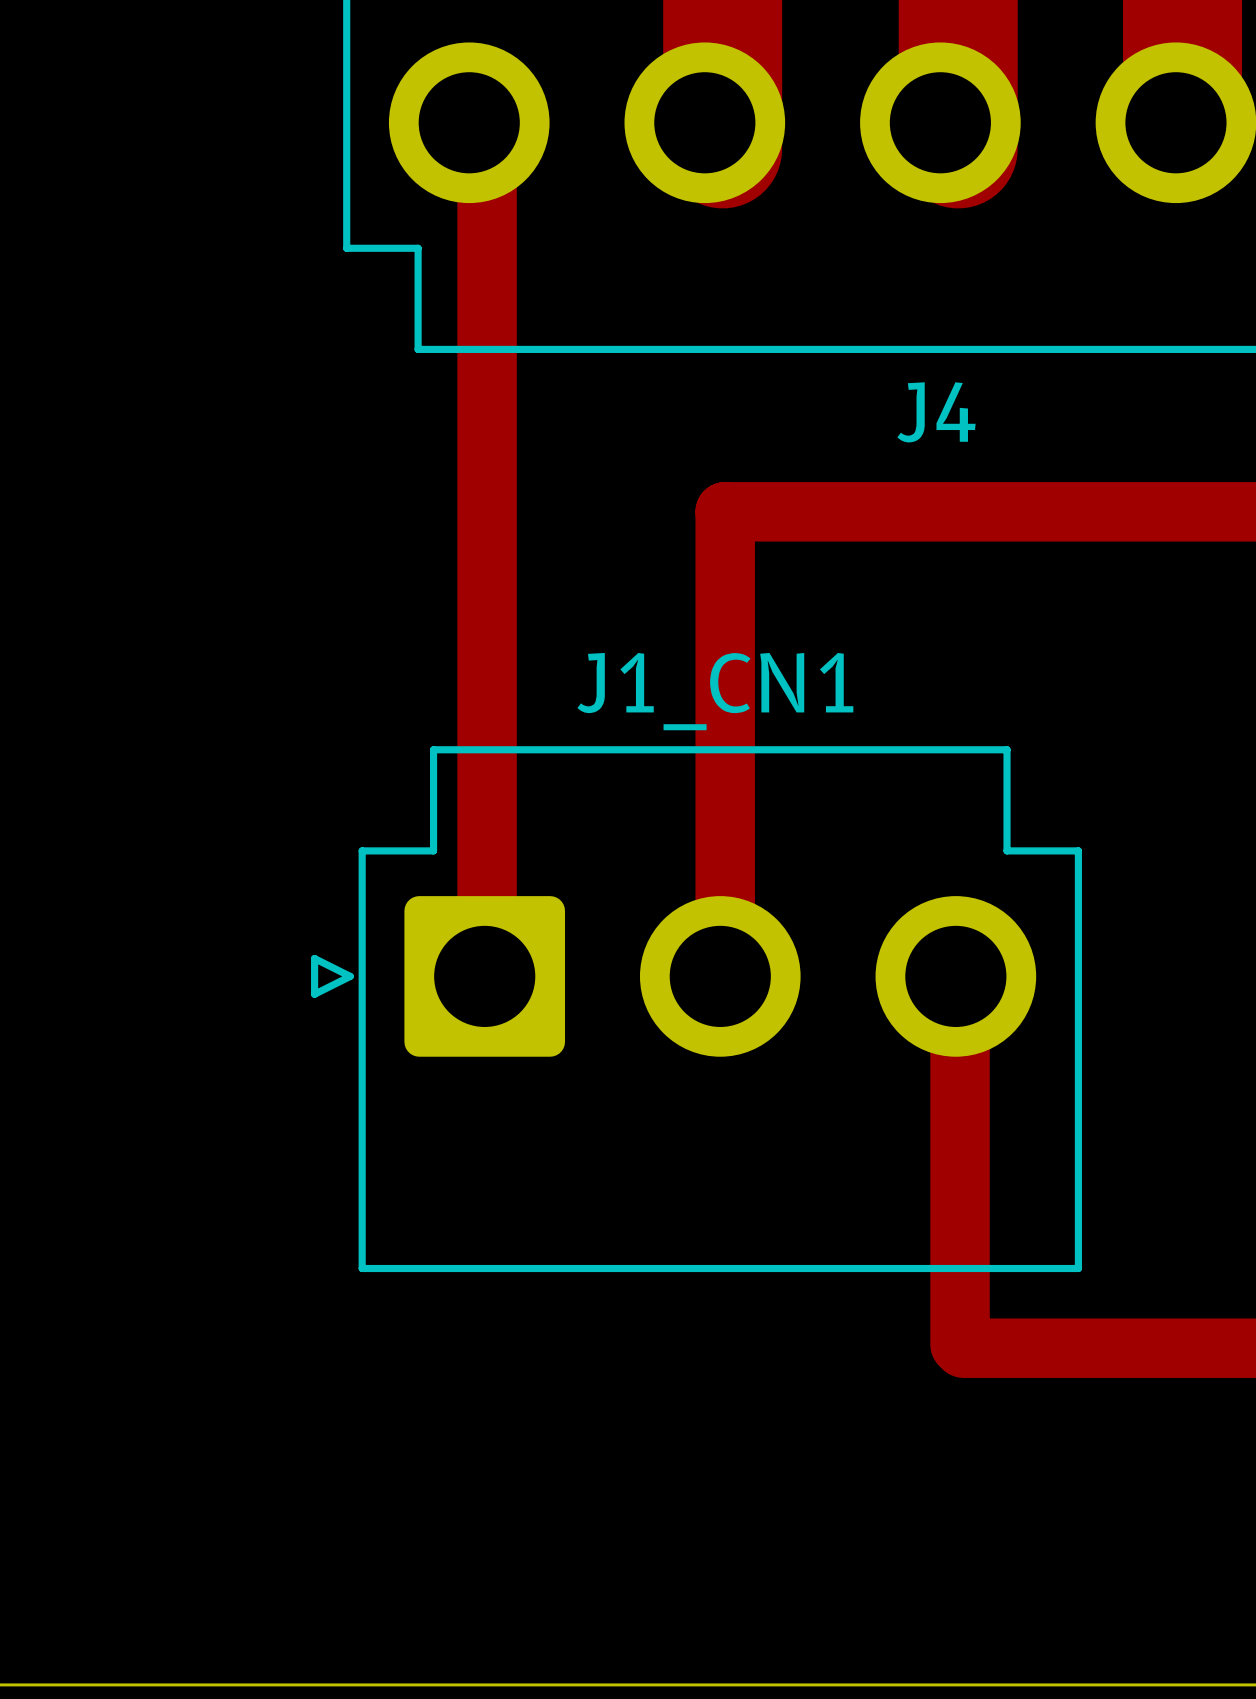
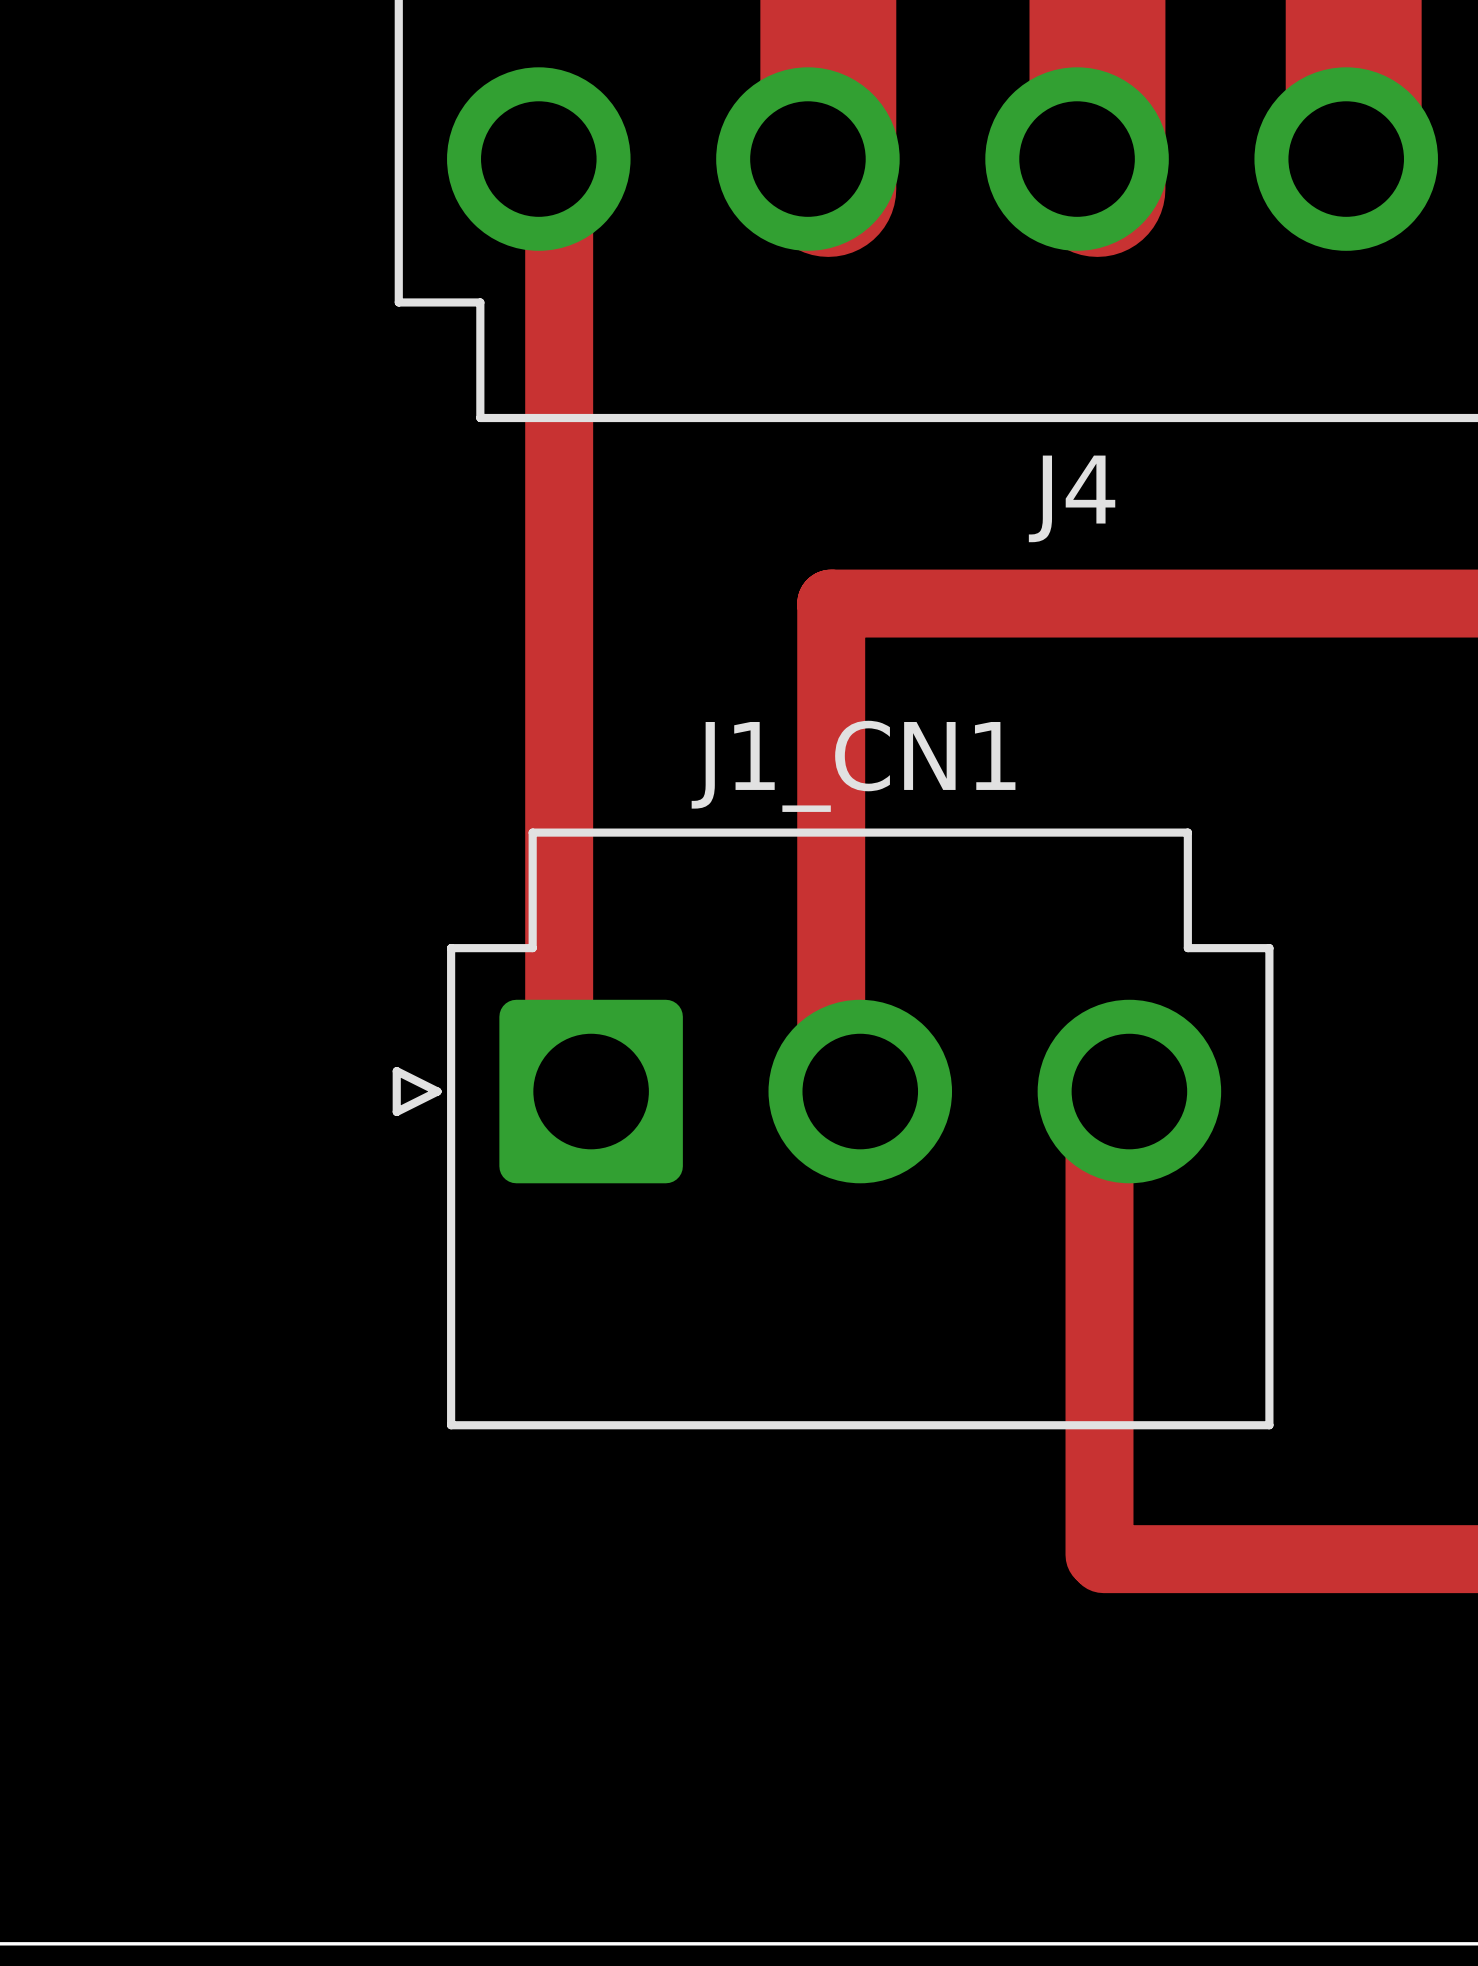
J1_CN1 position: (696, 1009) -> (833, 1128)

